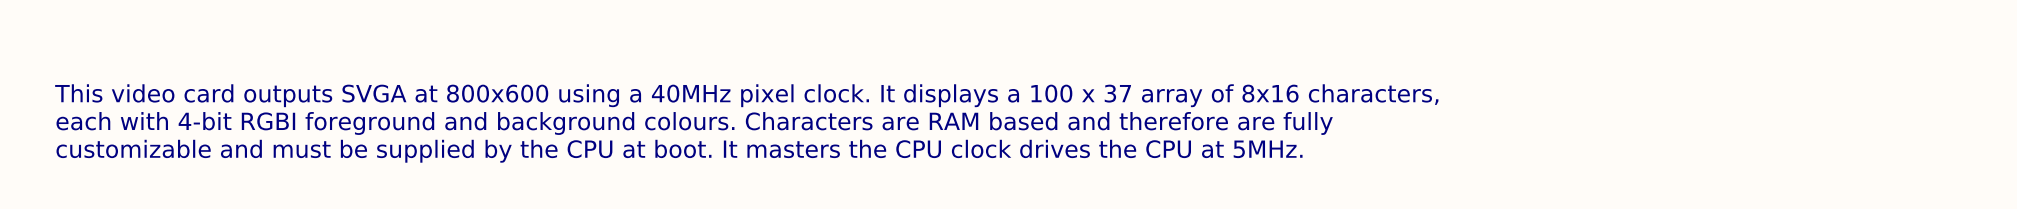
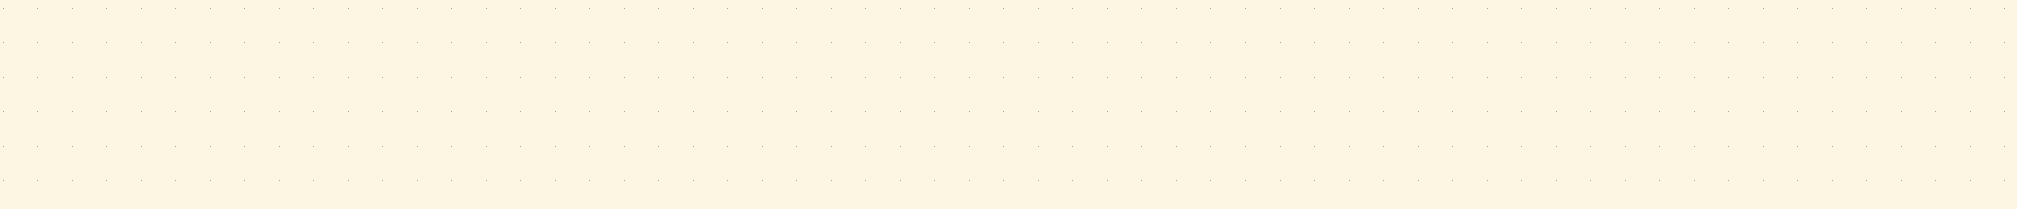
text: This video card outputs SVGA at 800x600 using a 40MHz pixel clock. It displays a 100 x 37 array of 8x16 characters, (746, 95) -> none
text: each with 4-bit RGBI foreground and background colours. Characters are RAM based and therefore are fully (694, 123) -> none
text: customizable and must be supplied by the CPU at boot. It masters the CPU clock drives the CPU at 5MHz. (679, 151) -> none

